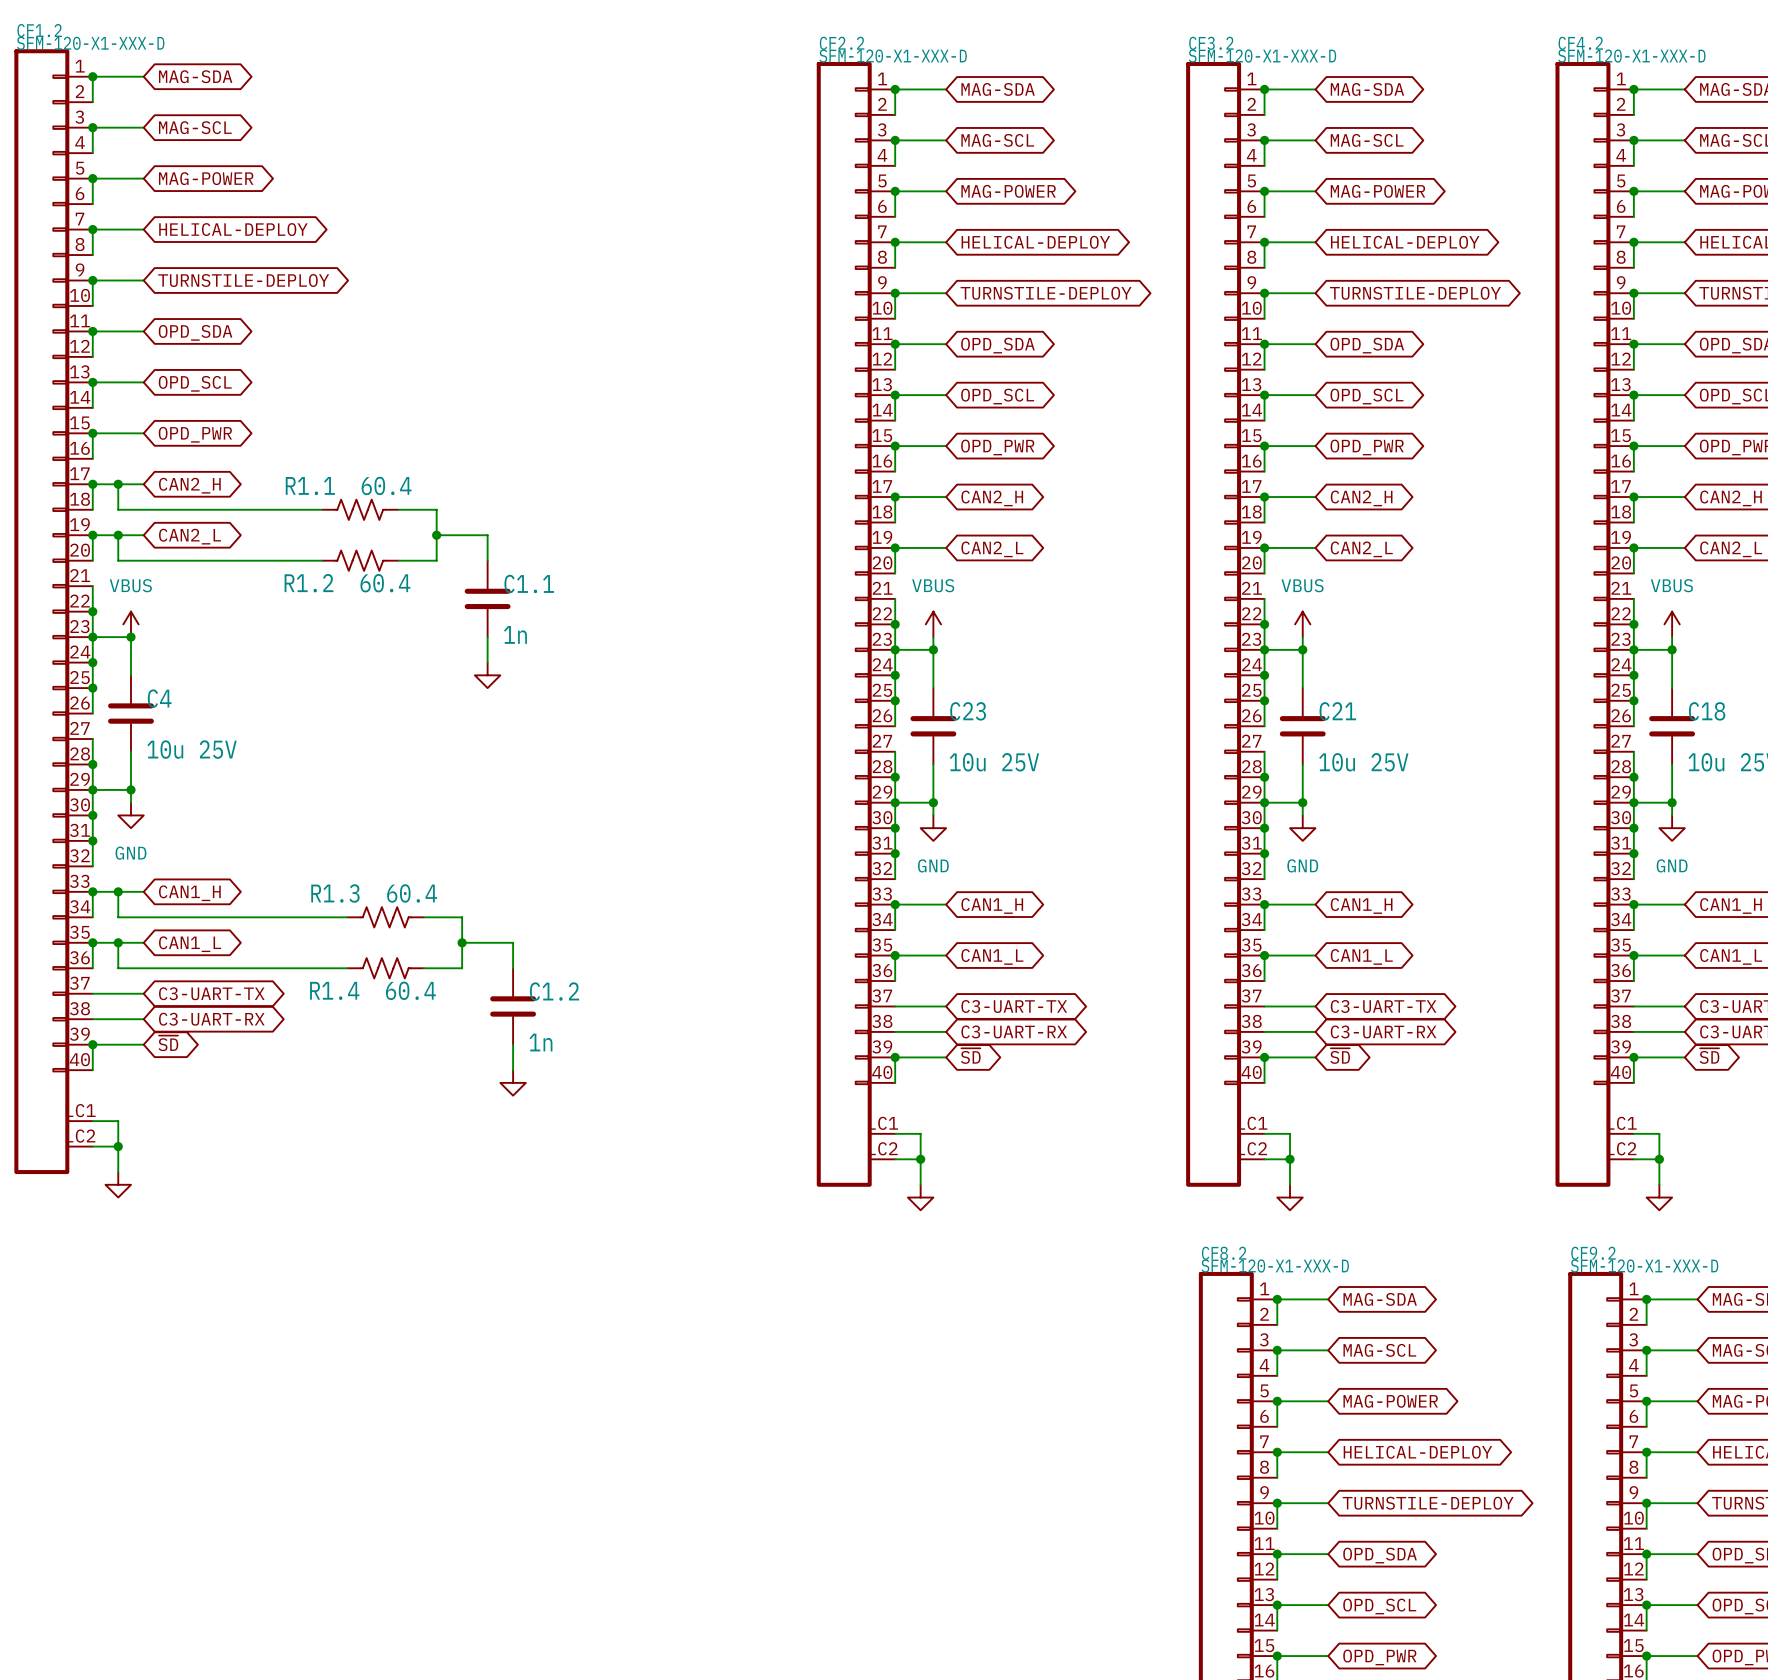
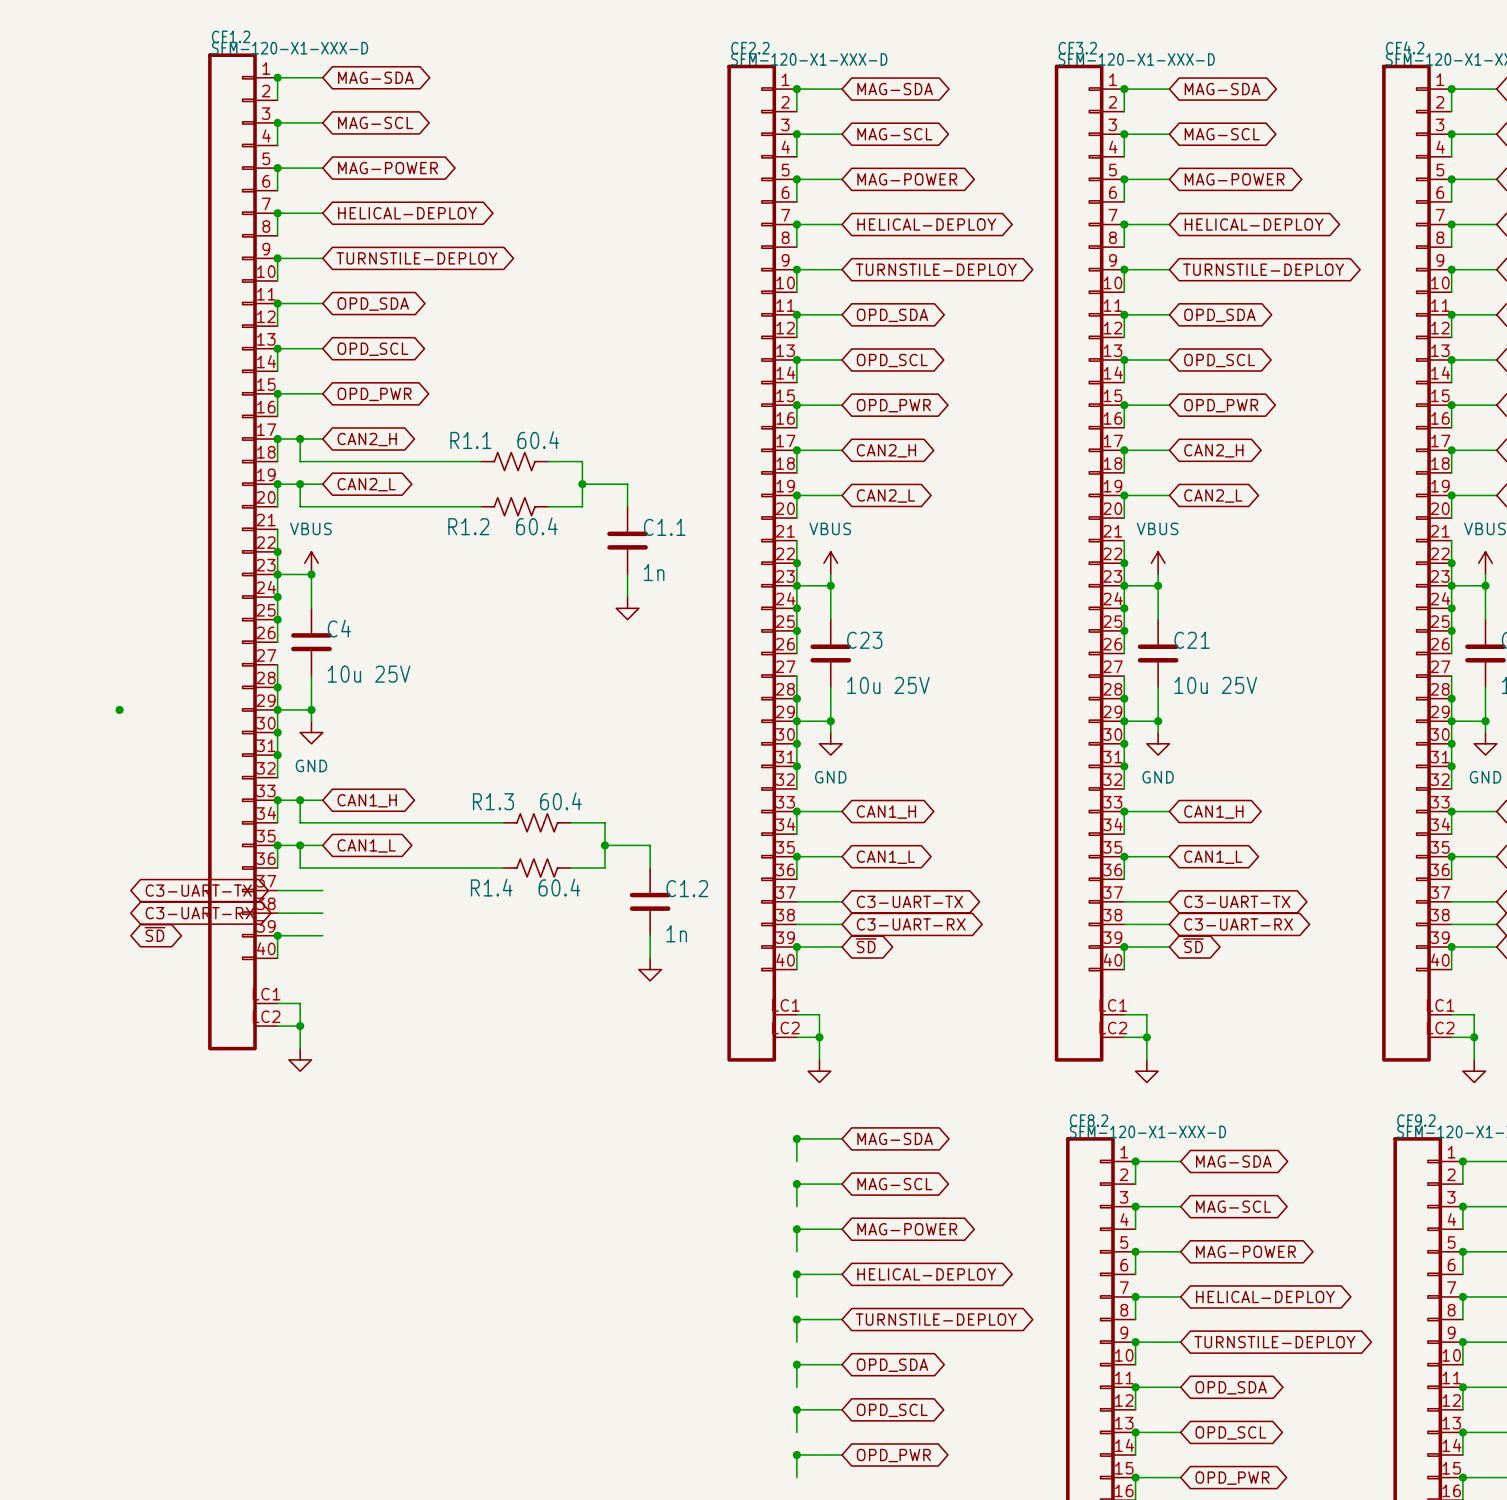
junction: (92, 76) -> none
wire: (143, 76) (92, 76) (92, 102) -> (322, 77) (277, 77) (277, 100)
global label position: MAG-SDA (195, 76) -> MAG-SDA (375, 77)
junction: none -> (277, 77)
junction: (92, 127) -> none
wire: (143, 127) (92, 127) (92, 153) -> (322, 122) (277, 122) (277, 145)
global label position: MAG-SCL (195, 127) -> MAG-SCL (375, 122)
junction: none -> (277, 122)
junction: (92, 178) -> none
wire: (143, 178) (92, 178) (92, 204) -> (322, 168) (277, 168) (277, 190)
global label position: MAG-POWER (206, 178) -> MAG-POWER (387, 168)
junction: none -> (277, 168)
junction: (92, 229) -> none
wire: (143, 229) (92, 229) (92, 255) -> (322, 213) (277, 213) (277, 235)
global label position: HELICAL-DEPLOY (233, 229) -> HELICAL-DEPLOY (407, 213)
junction: none -> (277, 213)
junction: (92, 280) -> none
wire: (143, 280) (92, 280) (92, 305) -> (322, 258) (277, 258) (277, 280)
global label position: TURNSTILE-DEPLOY (243, 280) -> TURNSTILE-DEPLOY (416, 258)
junction: none -> (277, 258)
junction: (92, 331) -> none
wire: (143, 331) (92, 331) (92, 356) -> (322, 303) (277, 303) (277, 326)
junction: none -> (277, 303)
global label position: OPD_SDA (195, 332) -> OPD_SDA (373, 304)
junction: (92, 382) -> none
wire: (143, 382) (92, 382) (92, 407) -> (322, 348) (277, 348) (277, 371)
junction: none -> (277, 348)
global label position: OPD_SCL (195, 383) -> OPD_SCL (372, 349)
junction: (92, 433) -> none
wire: (143, 433) (92, 433) (92, 458) -> (322, 393) (277, 393) (277, 416)
junction: none -> (277, 393)
global label position: OPD_PWR (195, 434) -> OPD_PWR (374, 394)
junction: (92, 484) -> none
wire: (118, 484) (118, 509) (322, 509) -> none
junction: (118, 484) -> none
wire: (143, 484) (92, 484) (92, 509) -> (322, 439) (277, 439) (277, 461)
junction: none -> (277, 439)
wire: none -> (300, 439) (300, 461) (356, 461)
junction: none -> (300, 439)
global label position: CAN2_H (189, 485) -> CAN2_H (367, 439)
R1.1 position: (360, 509) -> (514, 461)
wire: (436, 509) (436, 560) -> (390, 461) (480, 461)
wire: none -> (548, 461) (582, 461) (582, 506) (548, 506)
junction: (92, 535) -> none
wire: (118, 535) (118, 560) (322, 560) -> none
junction: (118, 535) -> none
wire: (143, 535) (92, 535) (92, 560) -> (322, 484) (277, 484) (277, 506)
junction: none -> (277, 484)
wire: none -> (300, 484) (300, 506) (356, 506)
junction: none -> (300, 484)
wire: (436, 535) (487, 535) (487, 560) -> (582, 484) (627, 484) (627, 506)
junction: (436, 535) -> none
junction: none -> (582, 484)
global label position: CAN2_L (190, 536) -> CAN2_L (366, 484)
R1.2 position: (360, 560) -> (514, 506)
wire: none -> (390, 506) (480, 506)
wire: (92, 586) (92, 713) -> (277, 529) (277, 642)
C1.1 position: (487, 598) -> (627, 540)
CF1.2 position: (53, 611) -> (242, 551)
junction: (92, 611) -> none
junction: none -> (277, 551)
power symbol position: VBUS (130, 624) -> VBUS (311, 563)
wire: (92, 637) (130, 637) (130, 675) -> (277, 574) (311, 574) (311, 608)
junction: (92, 637) -> none
junction: (130, 637) -> none
junction: none -> (277, 574)
junction: none -> (311, 574)
wire: (487, 637) (487, 662) -> (627, 574) (627, 597)
junction: (92, 662) -> none
junction: none -> (277, 597)
power symbol position: (487, 675) -> (627, 608)
junction: (92, 688) -> none
junction: none -> (277, 619)
C4 position: (130, 713) -> (311, 642)
wire: (92, 739) (92, 866) -> (277, 664) (277, 777)
wire: (130, 751) (130, 802) -> (311, 676) (311, 721)
junction: (92, 764) -> none
junction: none -> (277, 687)
wire: (92, 789) (130, 789) -> (277, 709) (311, 709)
junction: (92, 789) -> none
junction: none -> (277, 709)
junction: none -> (311, 709)
junction: (92, 815) -> none
power symbol position: GND (130, 815) -> GND (311, 732)
junction: none -> (277, 732)
junction: (92, 840) -> none
junction: none -> (277, 755)
junction: (92, 891) -> none
wire: (118, 891) (118, 917) (334, 917) -> (300, 800) (300, 822)
junction: (118, 891) -> none
wire: (143, 891) (92, 891) (92, 917) -> (322, 800) (277, 800) (277, 822)
junction: none -> (277, 800)
junction: none -> (300, 800)
global label position: CAN1_H (189, 893) -> CAN1_H (367, 800)
R1.3 position: (385, 917) -> (537, 822)
wire: (462, 917) (462, 968) -> (413, 822) (503, 822)
wire: none -> (571, 822) (604, 822) (604, 867) (571, 867)
junction: (92, 942) -> none
wire: (118, 942) (118, 968) (334, 968) -> (300, 845) (300, 867)
junction: (118, 942) -> none
wire: (143, 942) (92, 942) (92, 968) -> (322, 845) (277, 845) (277, 867)
junction: none -> (277, 845)
junction: none -> (300, 845)
wire: (462, 942) (513, 942) (513, 968) -> (604, 845) (650, 845) (650, 867)
junction: (462, 942) -> none
junction: none -> (604, 845)
global label position: CAN1_L (190, 944) -> CAN1_L (366, 845)
R1.4 position: (385, 968) -> (537, 867)
wire: none -> (413, 867) (503, 867)
wire: (92, 993) (143, 993) -> (277, 890) (322, 890)
C1.2 position: (513, 1006) -> (650, 901)
wire: (92, 1019) (143, 1019) -> (277, 913) (322, 913)
junction: (92, 1044) -> none
wire: (143, 1044) (92, 1044) (92, 1070) -> (322, 935) (277, 935) (277, 958)
junction: none -> (277, 935)
wire: (513, 1044) (513, 1070) -> (650, 935) (650, 958)
power symbol: (513, 1082) -> none
power symbol: none -> (650, 969)
wire: (92, 1121) (118, 1121) (118, 1172) -> (277, 1003) (300, 1003) (300, 1048)
wire: (92, 1146) (118, 1146) -> (277, 1026) (300, 1026)
junction: (118, 1146) -> none
junction: none -> (300, 1026)
power symbol: (118, 1184) -> none
power symbol: none -> (300, 1059)
junction: none -> (796, 1138)
wire: none -> (842, 1138) (796, 1138) (796, 1161)
global label: none -> MAG-SDA (895, 1138)
junction: none -> (796, 1184)
wire: none -> (842, 1184) (796, 1184) (796, 1206)
global label: none -> MAG-SCL (894, 1184)
junction: none -> (796, 1229)
wire: none -> (842, 1229) (796, 1229) (796, 1251)
global label: none -> MAG-POWER (907, 1229)
junction: none -> (796, 1274)
wire: none -> (842, 1274) (796, 1274) (796, 1296)
global label: none -> HELICAL-DEPLOY (926, 1274)
junction: none -> (796, 1319)
wire: none -> (842, 1319) (796, 1319) (796, 1342)
global label: none -> TURNSTILE-DEPLOY (936, 1319)
junction: none -> (796, 1364)
wire: none -> (842, 1364) (796, 1364) (796, 1387)
global label: none -> OPD_SDA (892, 1365)
junction: none -> (796, 1409)
wire: none -> (842, 1409) (796, 1409) (796, 1432)
global label: none -> OPD_SCL (892, 1410)
junction: none -> (796, 1455)
wire: none -> (842, 1455) (796, 1455) (796, 1477)
global label: none -> OPD_PWR (893, 1455)

